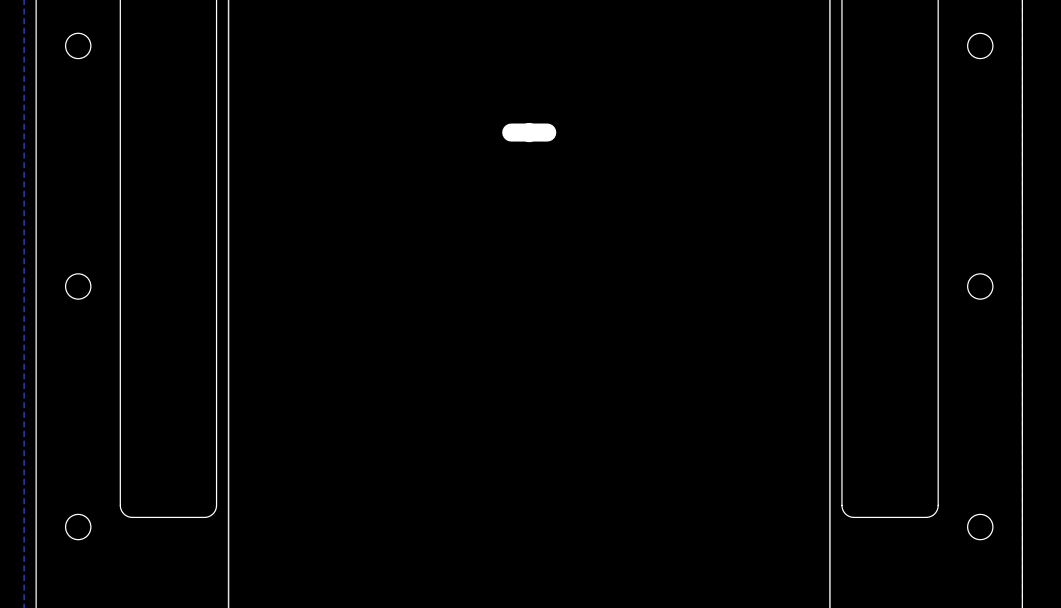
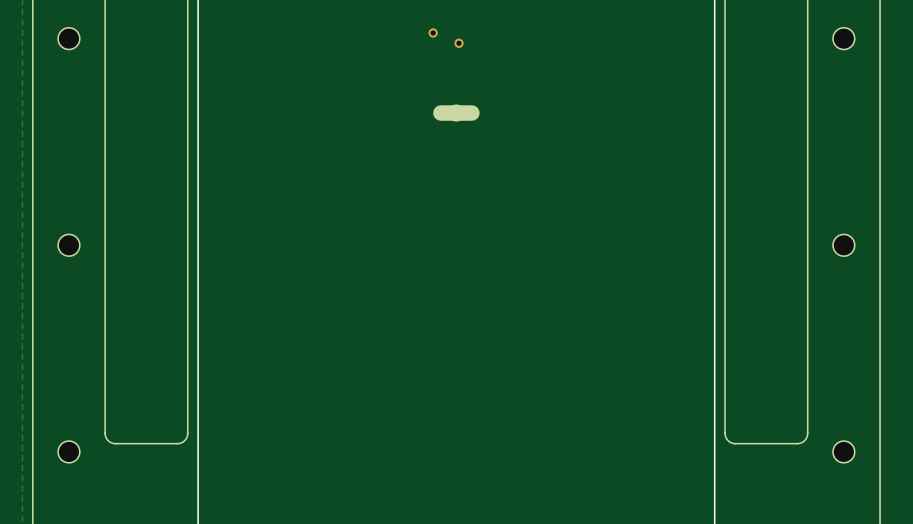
via: none -> (433, 32)
via: none -> (458, 43)

